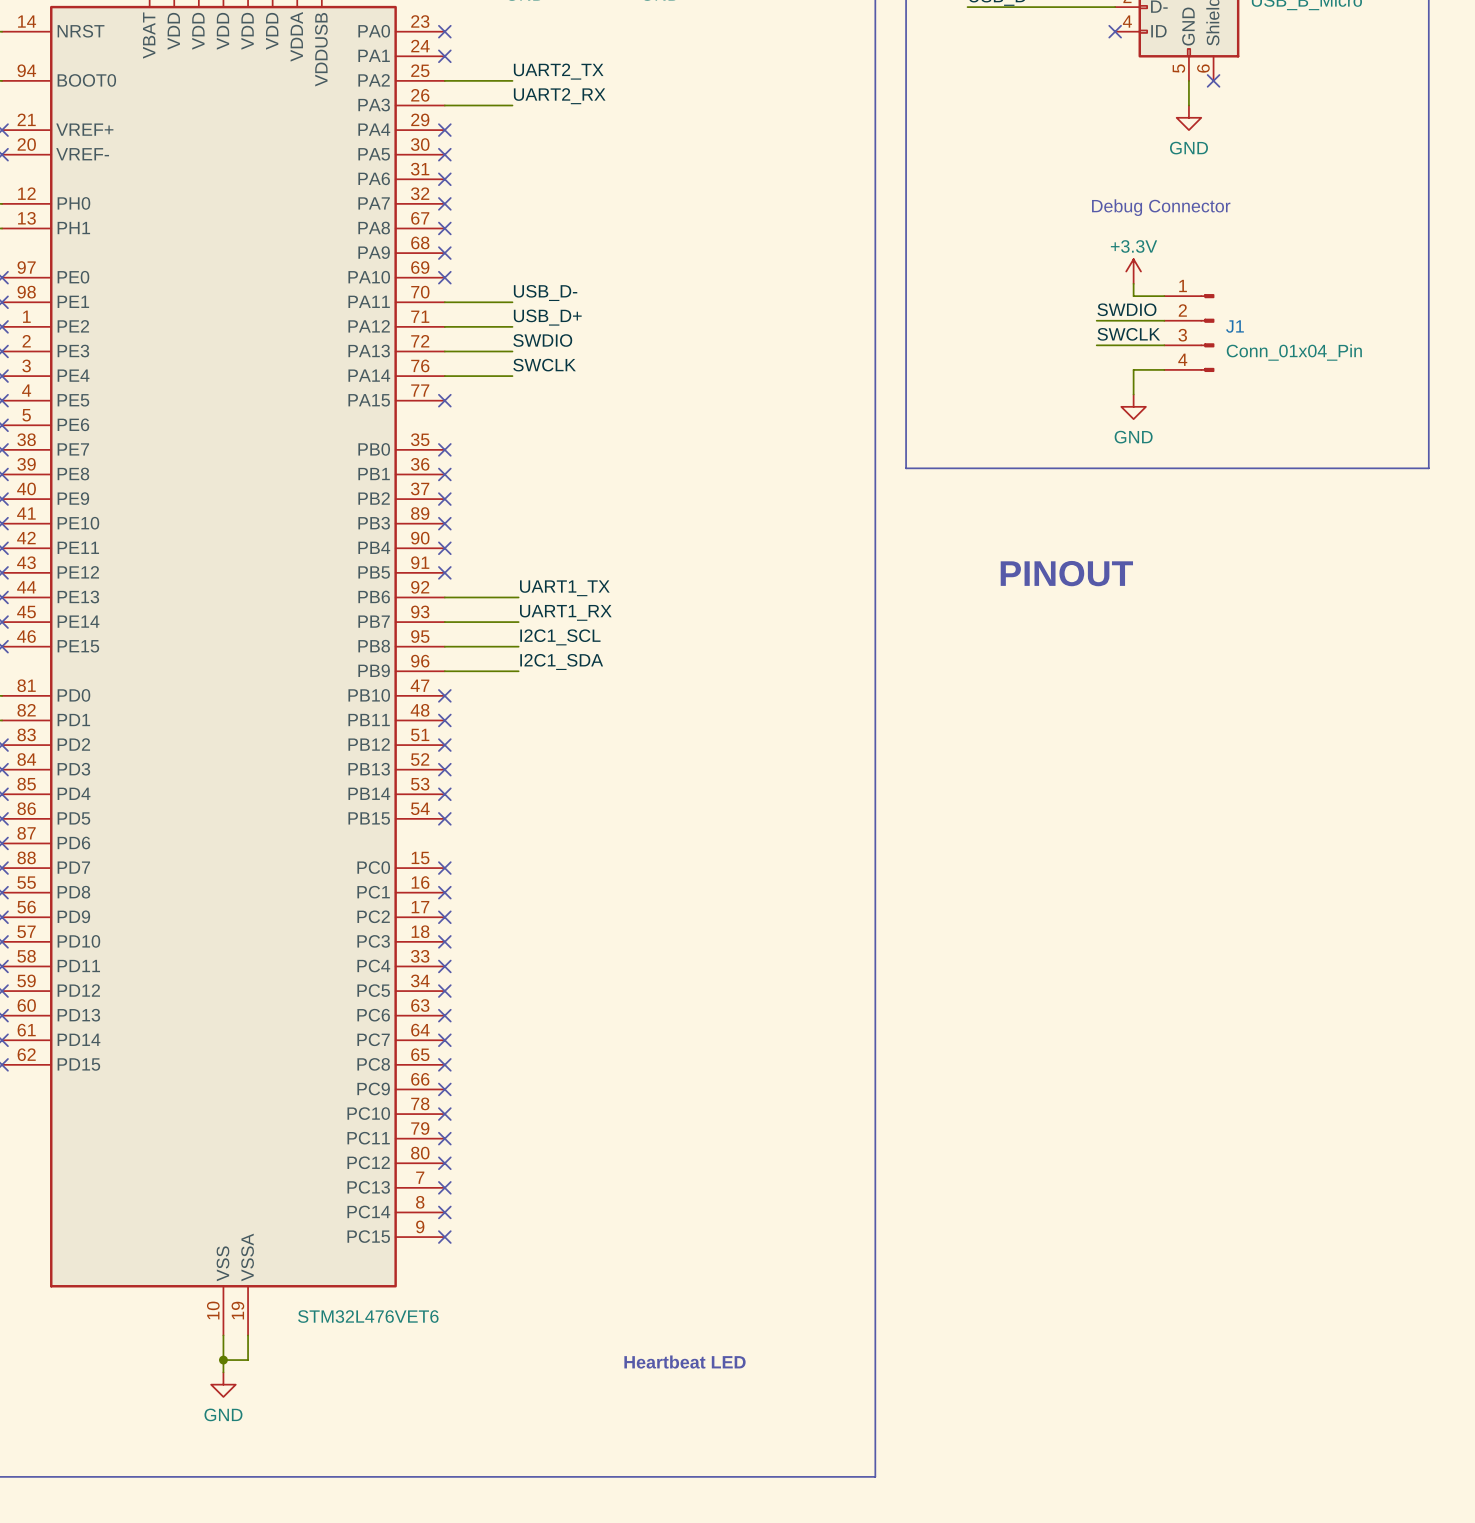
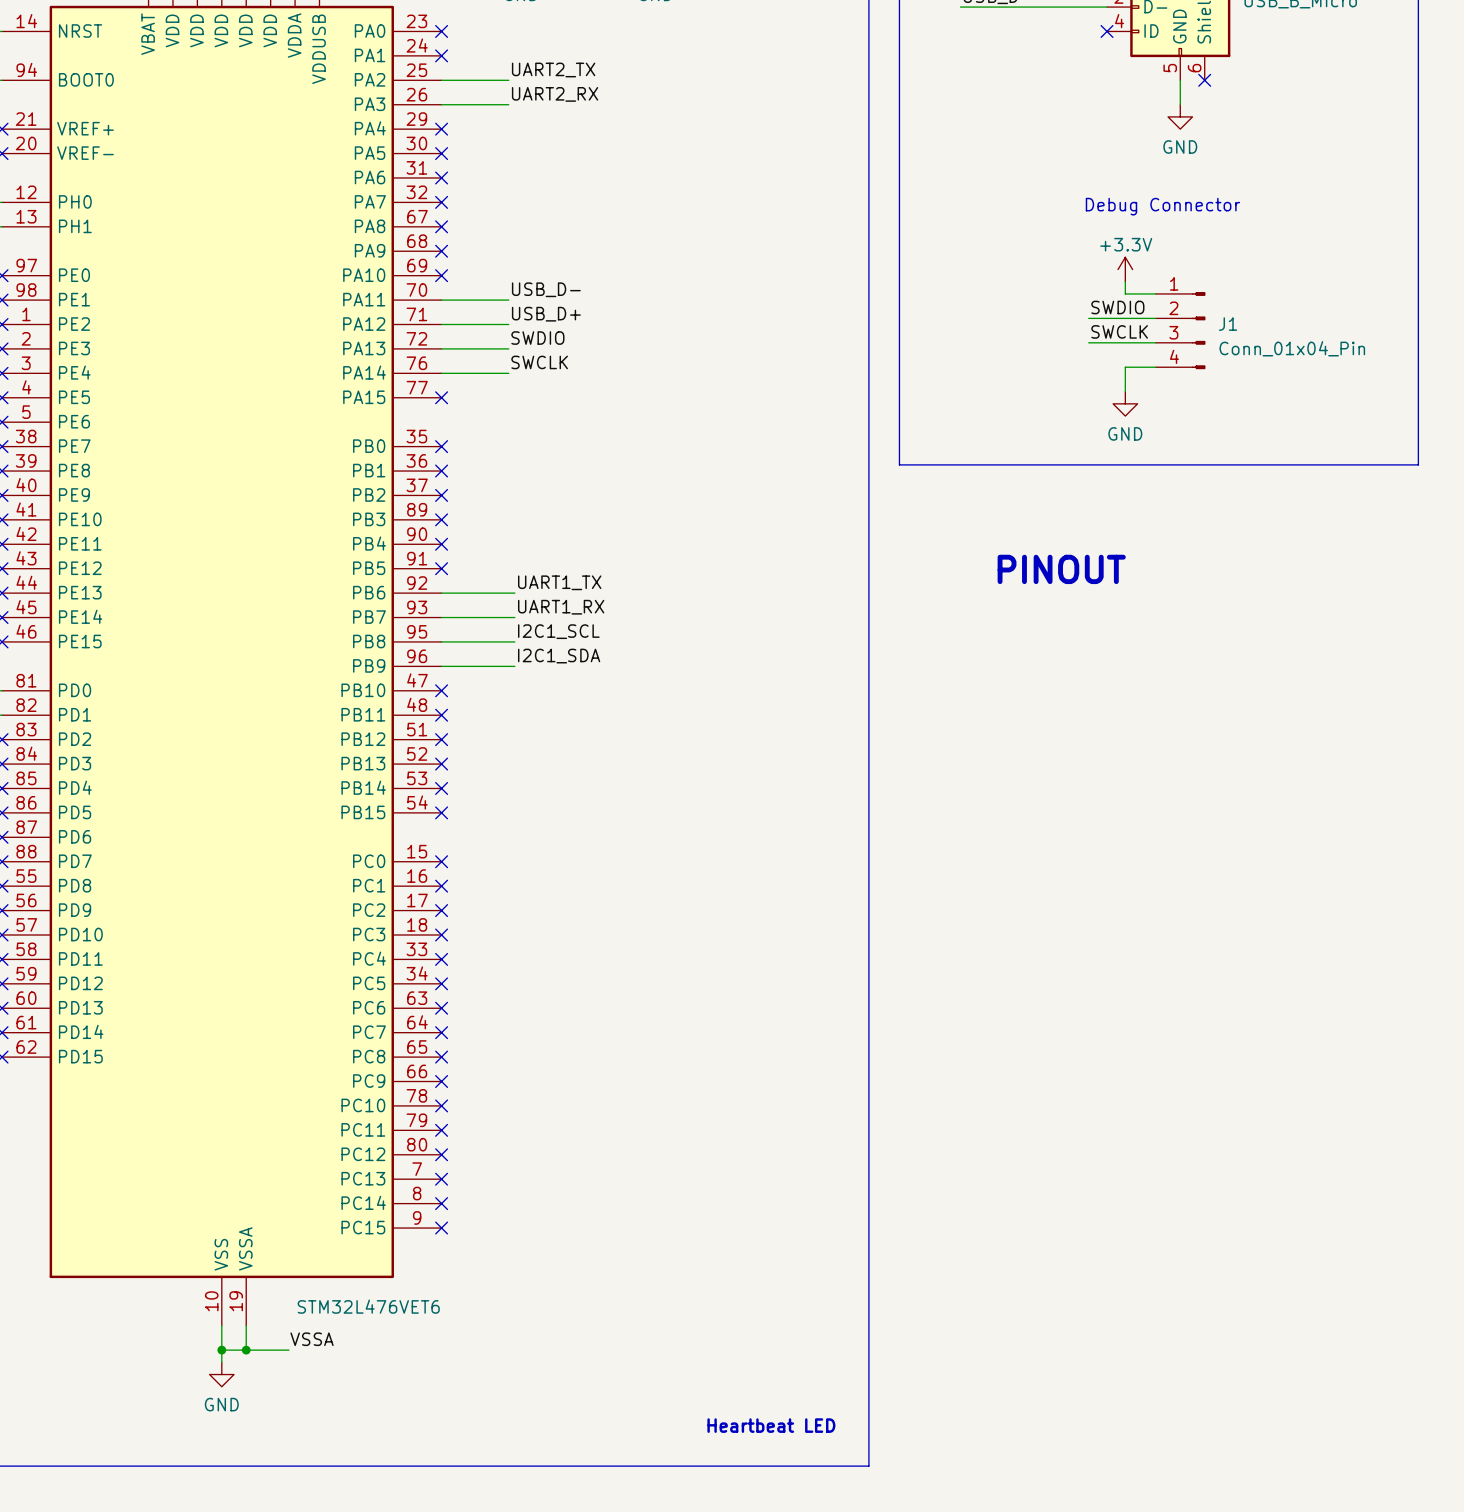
label: none -> VSSA (312, 1339)
wire: none -> (246, 1350) (288, 1350)
junction: none -> (246, 1350)
text position: Heartbeat LED (685, 1362) -> Heartbeat LED (771, 1425)

